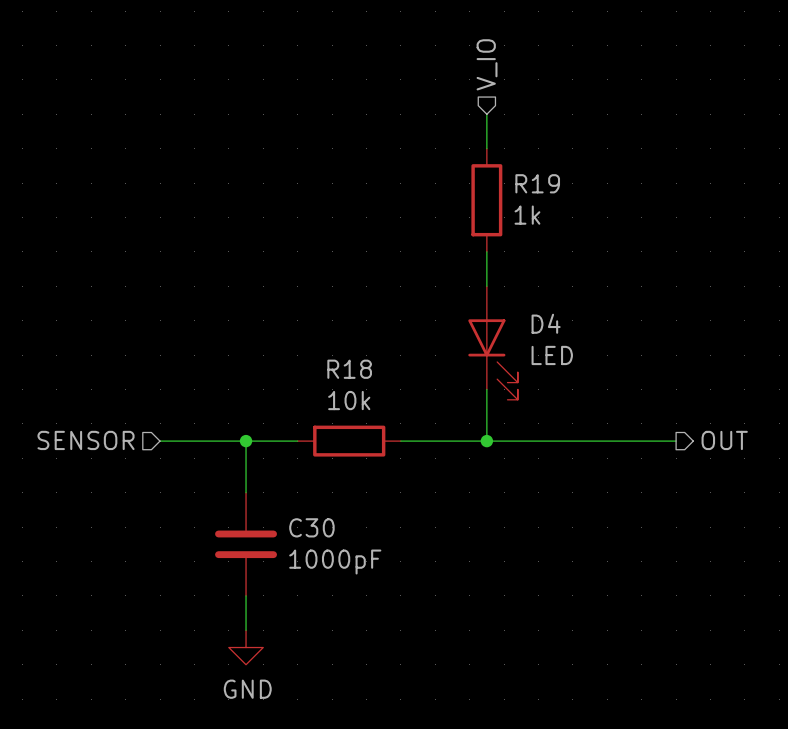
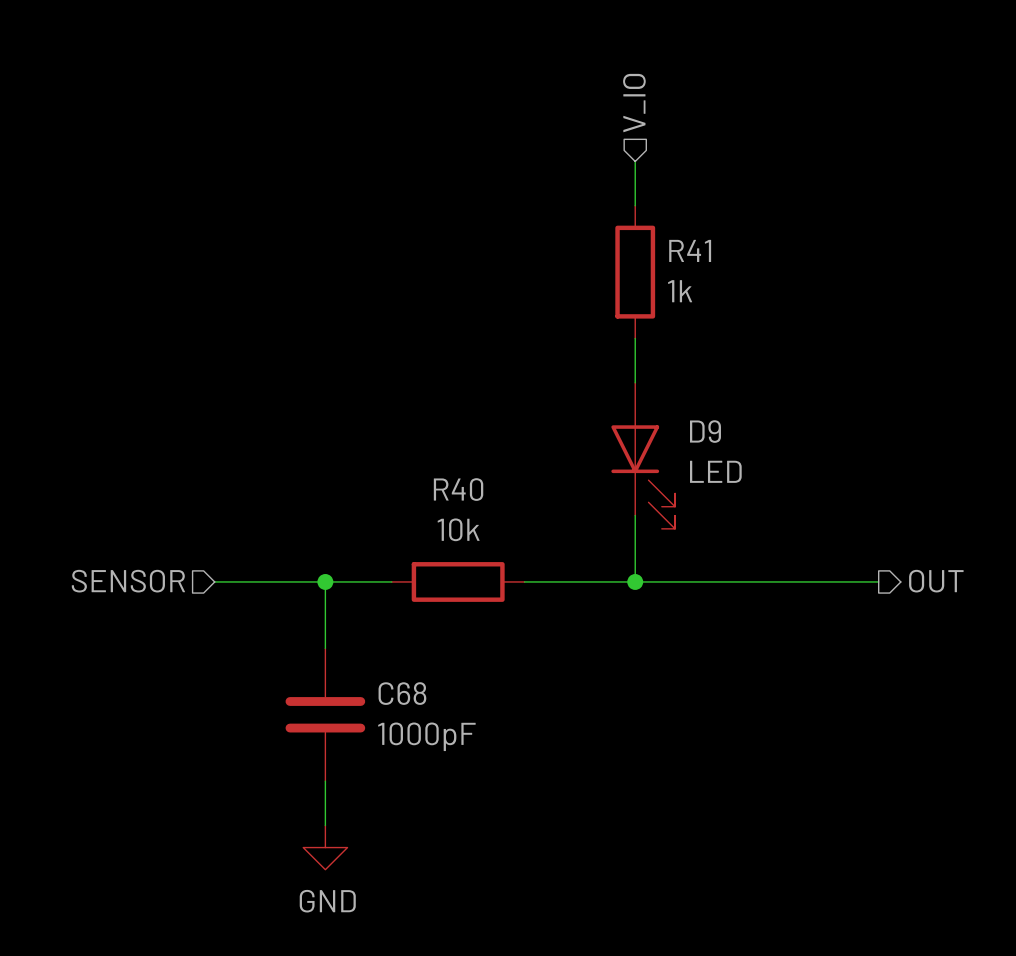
R19 name: R19 (537, 183) -> R41 (690, 250)
D4 name: D4 (546, 323) -> D9 (705, 431)
R18 name: R18 (349, 369) -> R40 (458, 489)
C30 name: C30 (311, 527) -> C68 (402, 693)

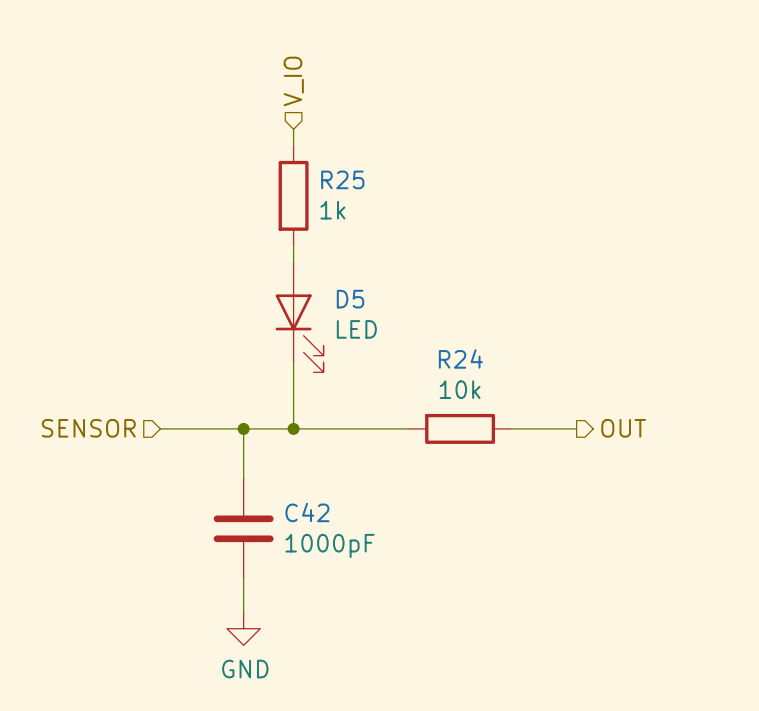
hierarchical label position: V_IO (634, 103) -> V_IO (293, 81)
wire: (635, 161) (635, 205) -> none
wire: none -> (293, 129) (293, 145)
R25: none -> 1k (293, 195)
R41: 1k (635, 272) -> none
wire: none -> (293, 245) (293, 262)
wire: (635, 338) (635, 382) -> none
D5: none -> LED (299, 317)
D9: LED (643, 455) -> none
wire: none -> (293, 362) (293, 428) (393, 428)
wire: (635, 515) (635, 581) -> none
junction: none -> (293, 428)
R40: 10k (458, 581) -> none
wire: (546, 581) (679, 581) -> none
R24: none -> 10k (460, 428)
junction: (635, 581) -> none
wire: (768, 581) (878, 581) -> none
hierarchical label position: OUT (936, 581) -> OUT (623, 428)
C68 name: C68 (402, 693) -> C42 (307, 512)

